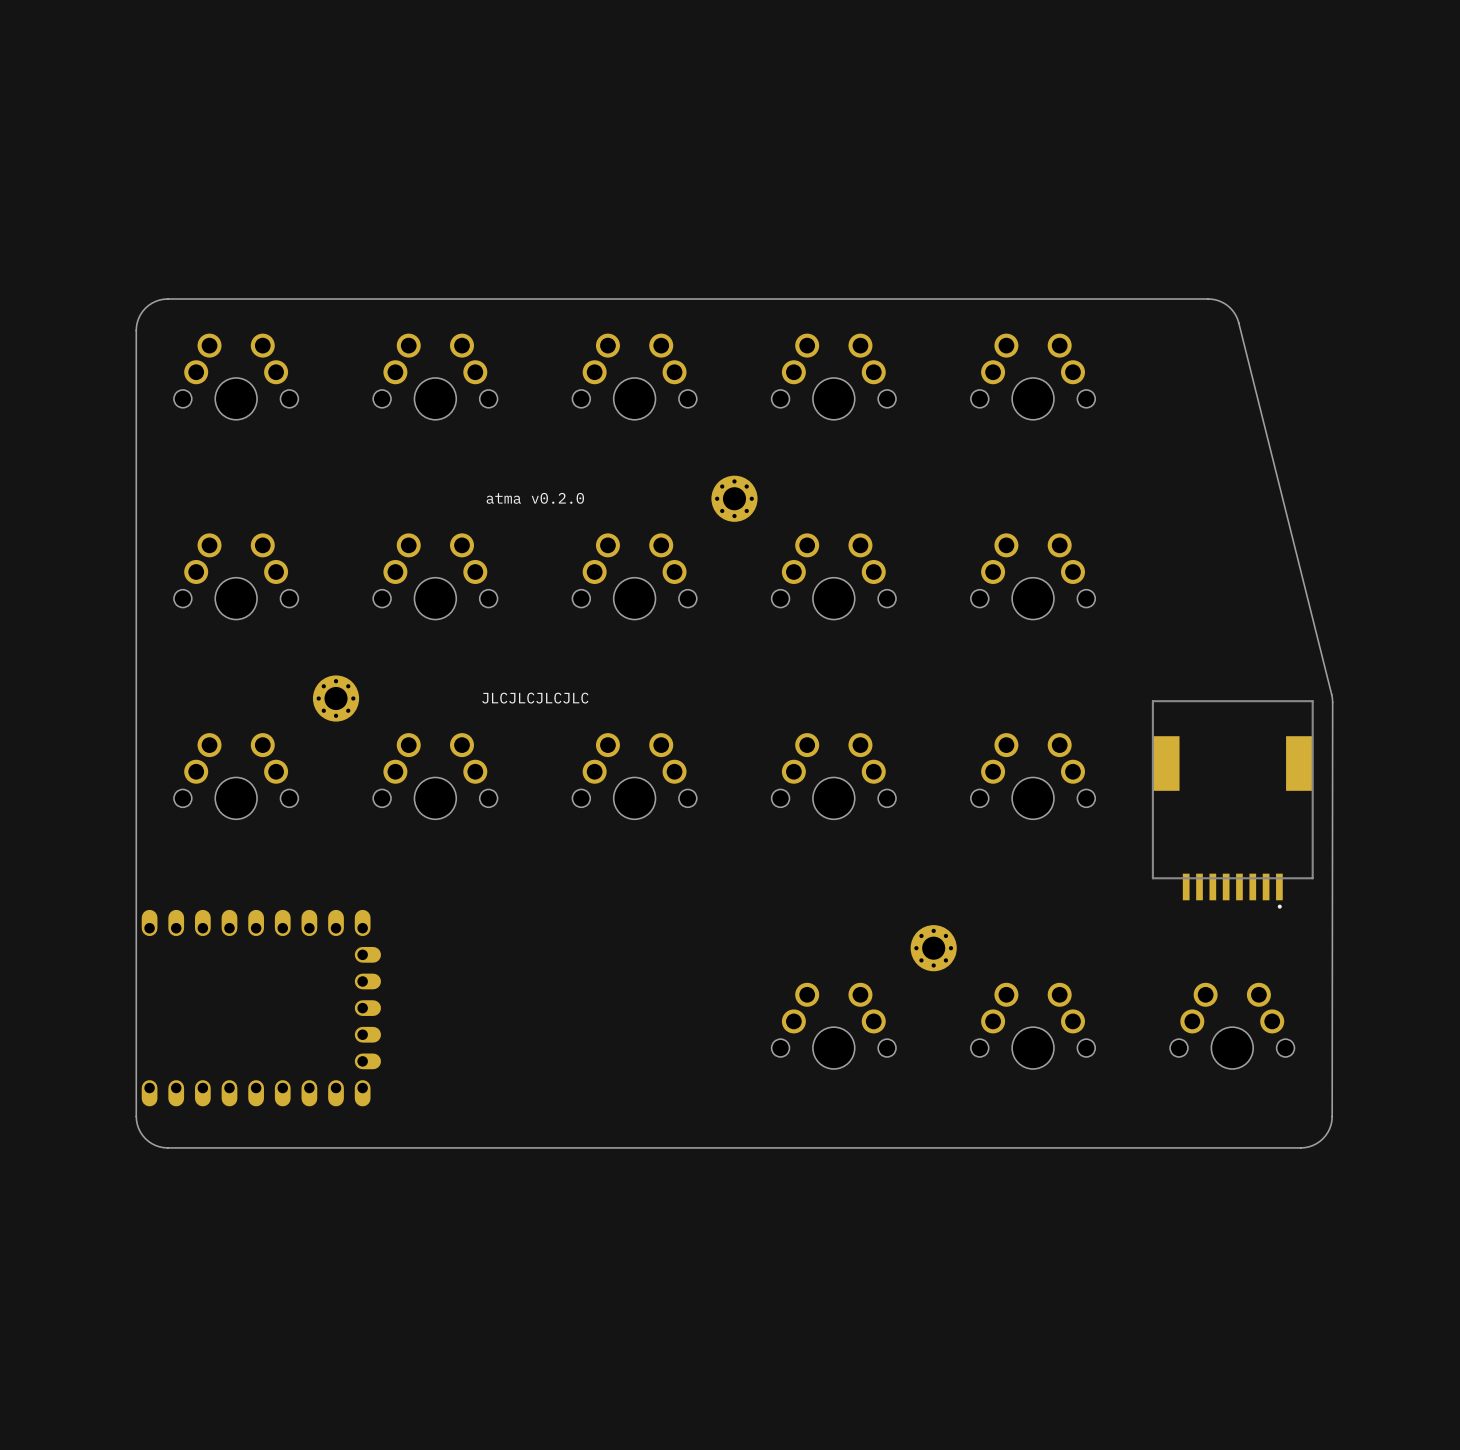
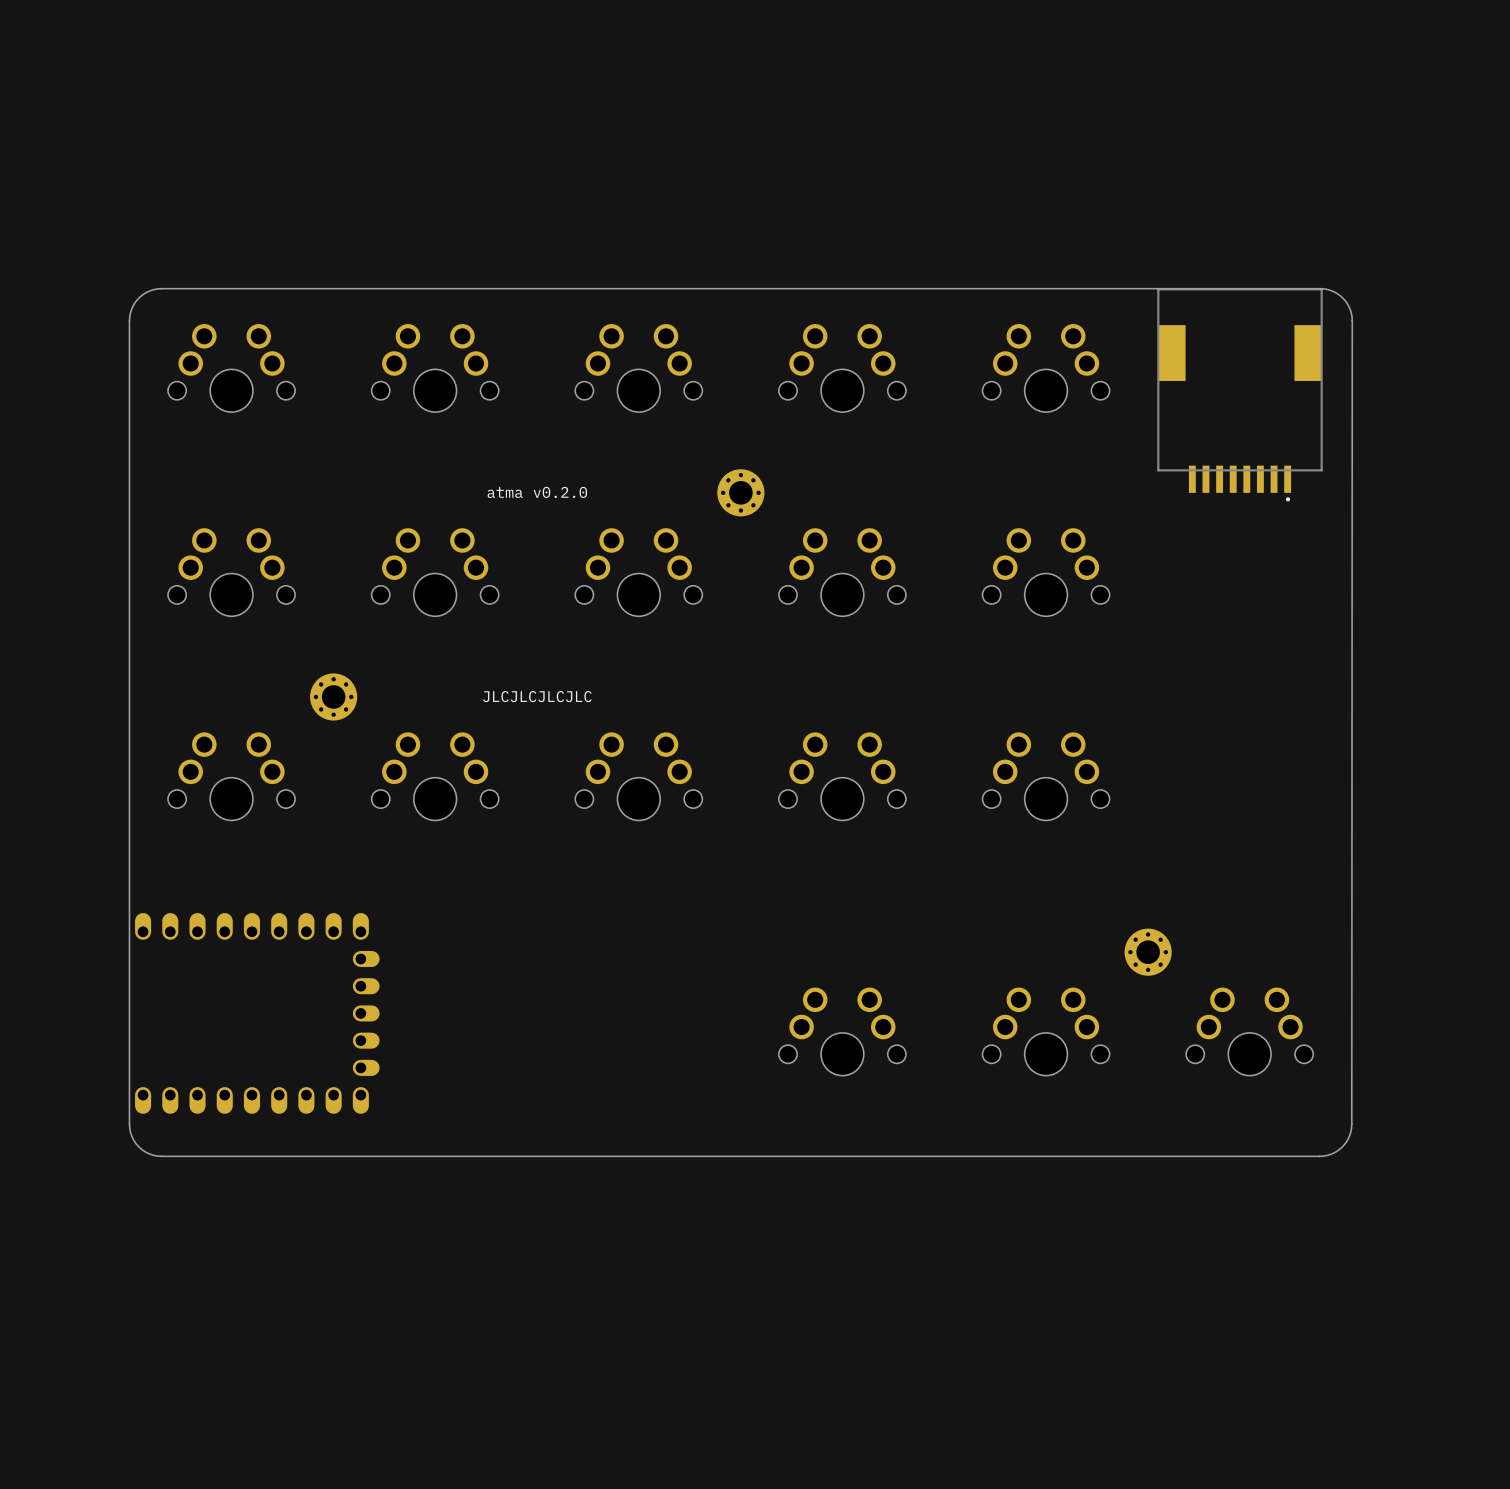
board edge: (1208, 299) (1218, 300) (1227, 305) (1237, 319) (1332, 698) (1331, 1120) (1327, 1132) (1319, 1141) (1308, 1146) (1300, 1147) -> (1320, 288) (1334, 291) (1342, 298) (1349, 306) (1352, 320) (1351, 1124) (1349, 1136) (1342, 1146) (1331, 1153) (1319, 1156)
board edge: none -> (1225, 288) (1320, 288)
part: none -> (1240, 394)
part: (1232, 804) -> none
part position: (933, 948) -> (1148, 952)

